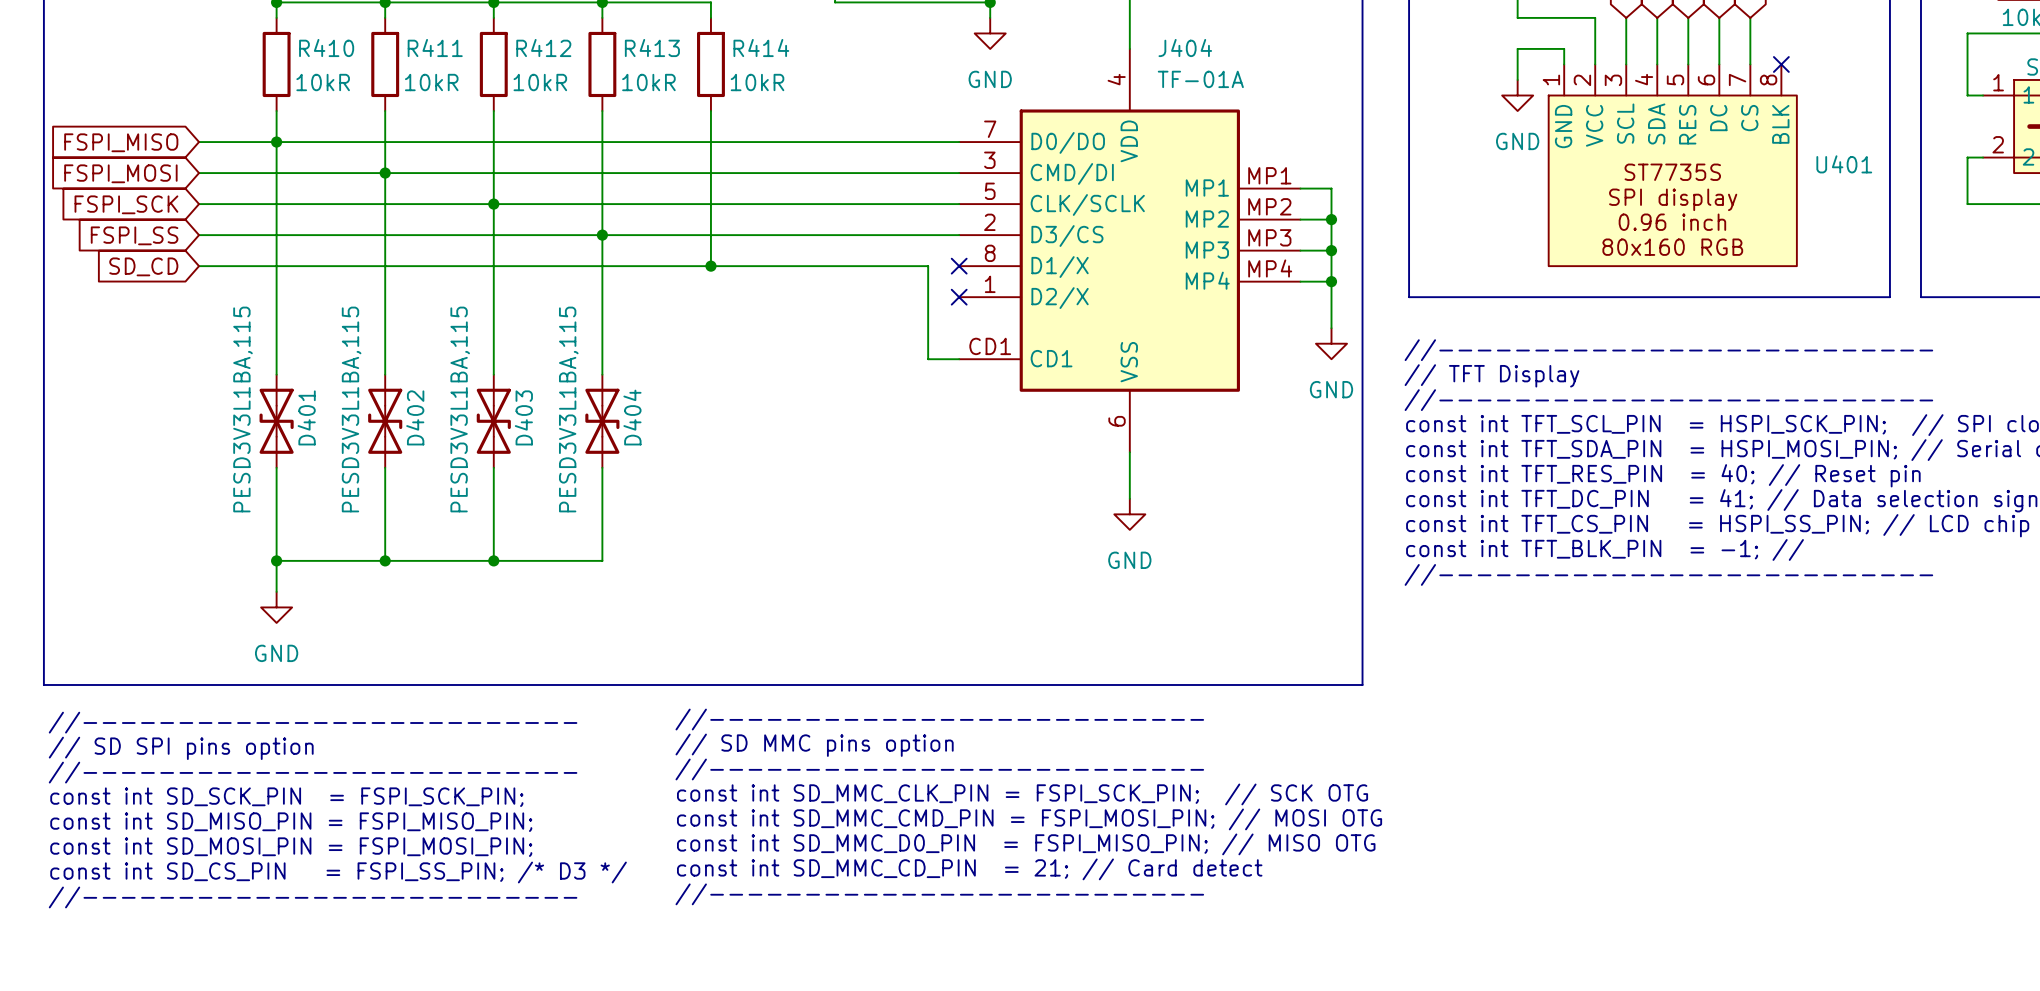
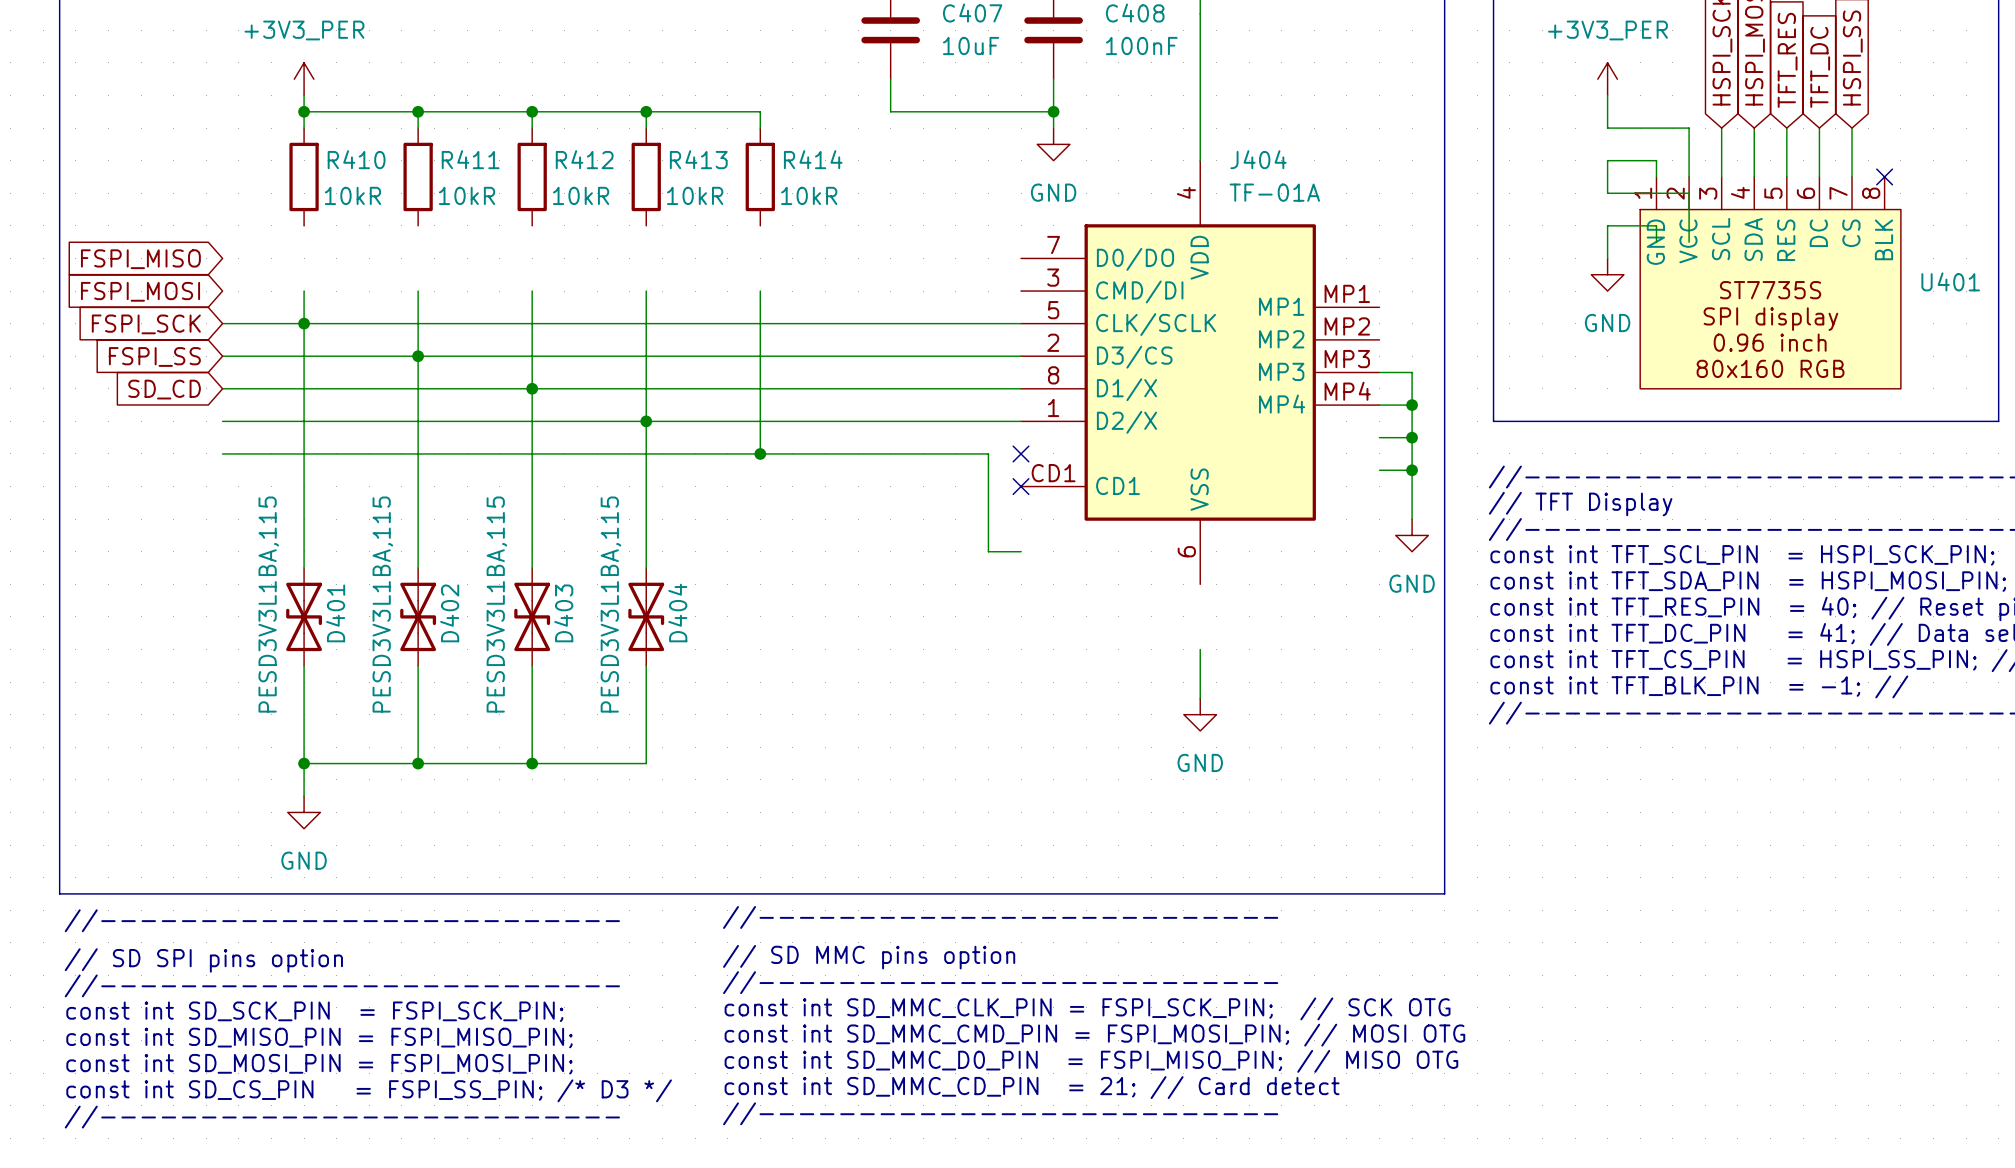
wire: none -> (1607, 193) (1689, 193) (1689, 242)
power symbol position: GND (1517, 95) -> GND (1607, 274)
wire: (276, 111) (276, 173) -> none
wire: (385, 111) (385, 173) -> none
wire: (493, 111) (493, 173) -> none
wire: (602, 111) (602, 173) -> none
wire: (710, 111) (710, 173) -> (760, 388) (760, 453)
wire: none -> (1656, 242) (1656, 225) (1607, 225) (1607, 258)
wire: (199, 142) (959, 142) -> none
junction: (276, 142) -> none
wire: (199, 173) (959, 173) -> (222, 421) (1021, 421)
junction: (385, 173) -> none
wire: (1300, 188) (1331, 188) (1331, 250) -> none
junction: none -> (304, 323)
junction: (493, 204) -> none
wire: (1300, 219) (1331, 219) -> (1379, 437) (1412, 437)
junction: (1331, 219) -> none
junction: none -> (418, 356)
junction: (602, 235) -> none
junction: (1331, 250) -> none
junction: none -> (532, 388)
junction: (710, 266) -> none
wire: (928, 266) (928, 328) -> (988, 388) (1021, 388)
no-connect mark: (959, 266) -> none
junction: none -> (646, 421)
no-connect mark: (959, 297) -> none
junction: none -> (1412, 437)
wire: none -> (222, 453) (988, 453)
junction: none -> (760, 453)
no-connect mark: none -> (1021, 453)
wire: none -> (1412, 453) (1412, 519)
wire: none -> (1379, 470) (1412, 470)
junction: none -> (1412, 470)
power symbol position: GND (1331, 343) -> GND (1412, 535)
wire: (928, 359) (959, 359) -> (988, 486) (988, 551) (1021, 551)
no-connect mark: none -> (1021, 486)
D401 position: (276, 421) -> (304, 616)
D402 position: (385, 421) -> (418, 616)
D403 position: (493, 421) -> (532, 616)
D404 position: (602, 421) -> (646, 616)
wire: (1129, 452) (1129, 498) -> (1200, 649) (1200, 698)
power symbol position: GND (1129, 514) -> GND (1200, 714)
wire: (276, 560) (602, 560) -> (304, 763) (646, 763) (646, 698)
junction position: (276, 560) -> (304, 763)
wire: none -> (418, 698) (418, 763)
junction position: (385, 560) -> (418, 763)
wire: none -> (532, 698) (532, 763)
junction position: (493, 560) -> (532, 763)
wire: none -> (304, 730) (304, 796)
power symbol position: GND (276, 607) -> GND (304, 812)
line: (43, 684) (1362, 684) -> (59, 828) (59, 893) (1444, 893) (1444, 828)
text: //-------------------------- (939, 719) -> none
text: //-------------------------- (313, 722) -> none
text position: // SD MMC pins option (814, 745) -> // SD MMC pins option (869, 957)
text position: // SD SPI pins option (181, 748) -> // SD SPI pins option (203, 960)
text position: const int SD_MMC_CLK_PIN = FSPI_SCK_PIN; // SCK OTG (1022, 794) -> const int SD_MMC_CLK_PIN = FSPI_SCK_PIN; // SCK OTG (1087, 1008)
text position: const int SD_SCK_PIN = FSPI_SCK_PIN; (286, 797) -> const int SD_SCK_PIN = FSPI_SCK_PIN; (314, 1011)
text position: const int SD_MMC_CMD_PIN = FSPI_MOSI_PIN; // MOSI OTG (1029, 819) -> const int SD_MMC_CMD_PIN = FSPI_MOSI_PIN; // MOSI OTG (1094, 1035)
text position: const int SD_MISO_PIN = FSPI_MISO_PIN; (291, 822) -> const int SD_MISO_PIN = FSPI_MISO_PIN; (319, 1037)
text: none -> //-------------------------- (1000, 982)
text: none -> //-------------------------- (342, 985)
text position: const int SD_MMC_D0_PIN = FSPI_MISO_PIN; // MISO OTG (1026, 844) -> const int SD_MMC_D0_PIN = FSPI_MISO_PIN; // MISO OTG (1091, 1061)
text position: const int SD_MOSI_PIN = FSPI_MOSI_PIN; (291, 847) -> const int SD_MOSI_PIN = FSPI_MOSI_PIN; (319, 1064)
text position: const int SD_MMC_CD_PIN = 21; // Card detect (969, 869) -> const int SD_MMC_CD_PIN = 21; // Card detect (1032, 1087)
text position: const int SD_CS_PIN = FSPI_SS_PIN; /* D3 */ (338, 872) -> const int SD_CS_PIN = FSPI_SS_PIN; /* D3 */ (369, 1090)
text: //-------------------------- (939, 894) -> none
text: //-------------------------- (313, 897) -> none
text: none -> //-------------------------- (1000, 1113)
text: none -> //-------------------------- (342, 1117)

